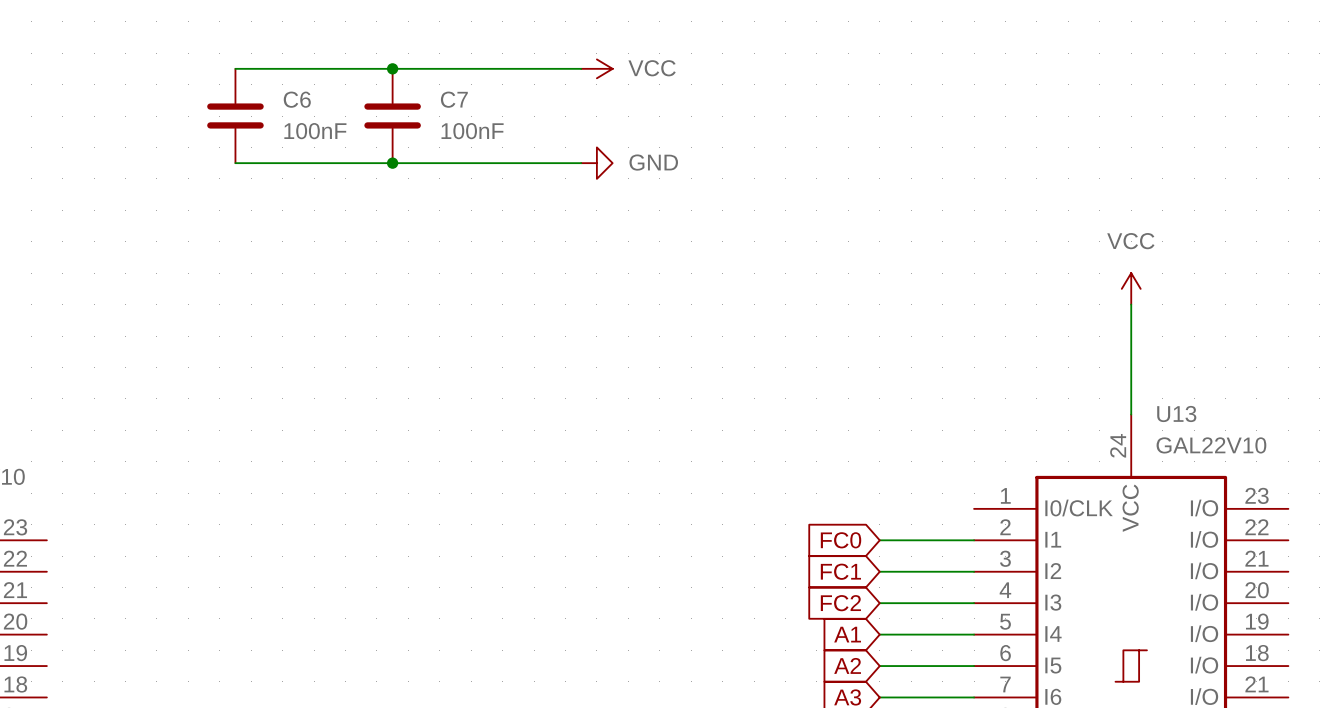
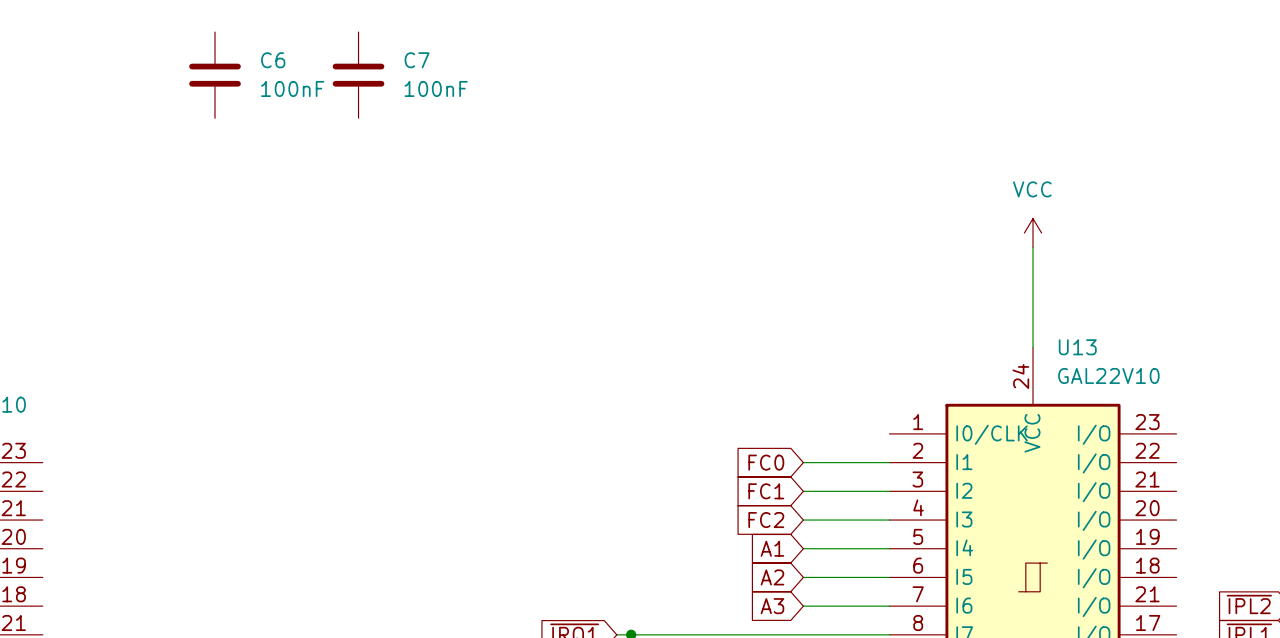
wire: (235, 68) (581, 68) -> none
junction: (392, 68) -> none
power symbol: VCC (596, 68) -> none
wire: (235, 163) (581, 163) -> none
junction: (392, 163) -> none
power symbol: GND (596, 163) -> none

